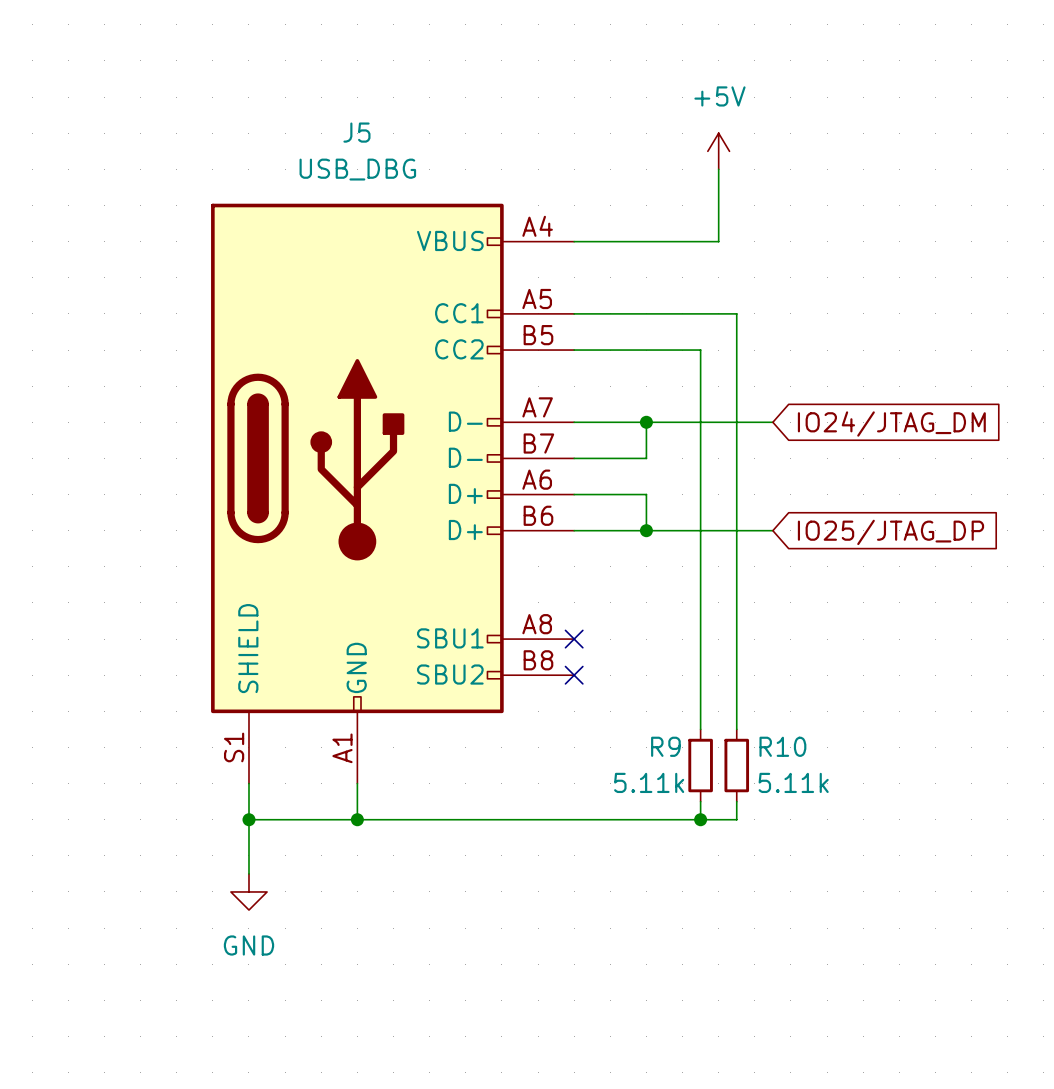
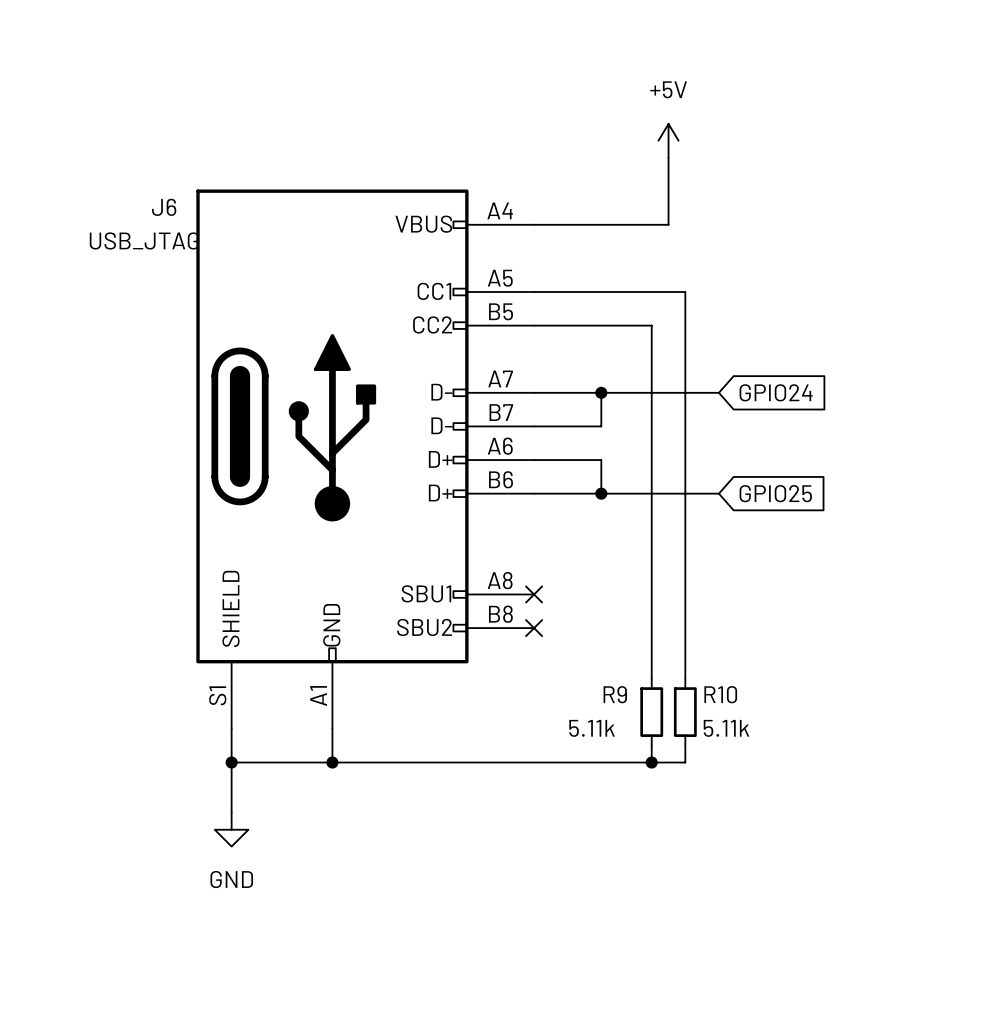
J5 name: J5 (356, 132) -> J6 (164, 207)
J5 value: USB_DBG (357, 169) -> USB_JTAG (144, 240)
global label: IO24/JTAG_DM (891, 424) -> GPIO24 (776, 392)
global label: IO25/JTAG_DP (890, 532) -> GPIO25 (775, 493)

